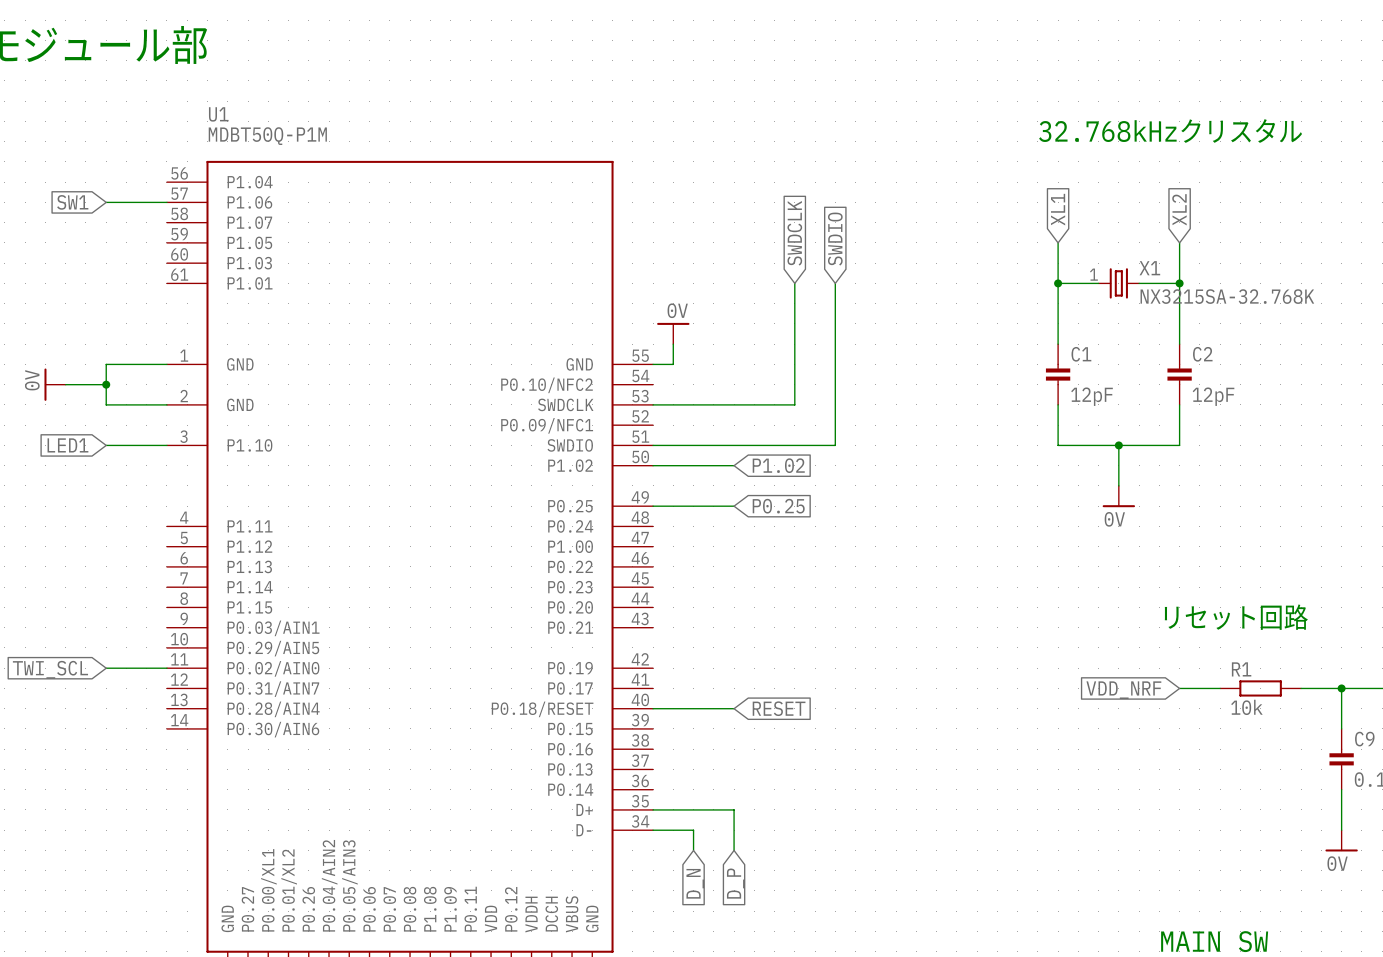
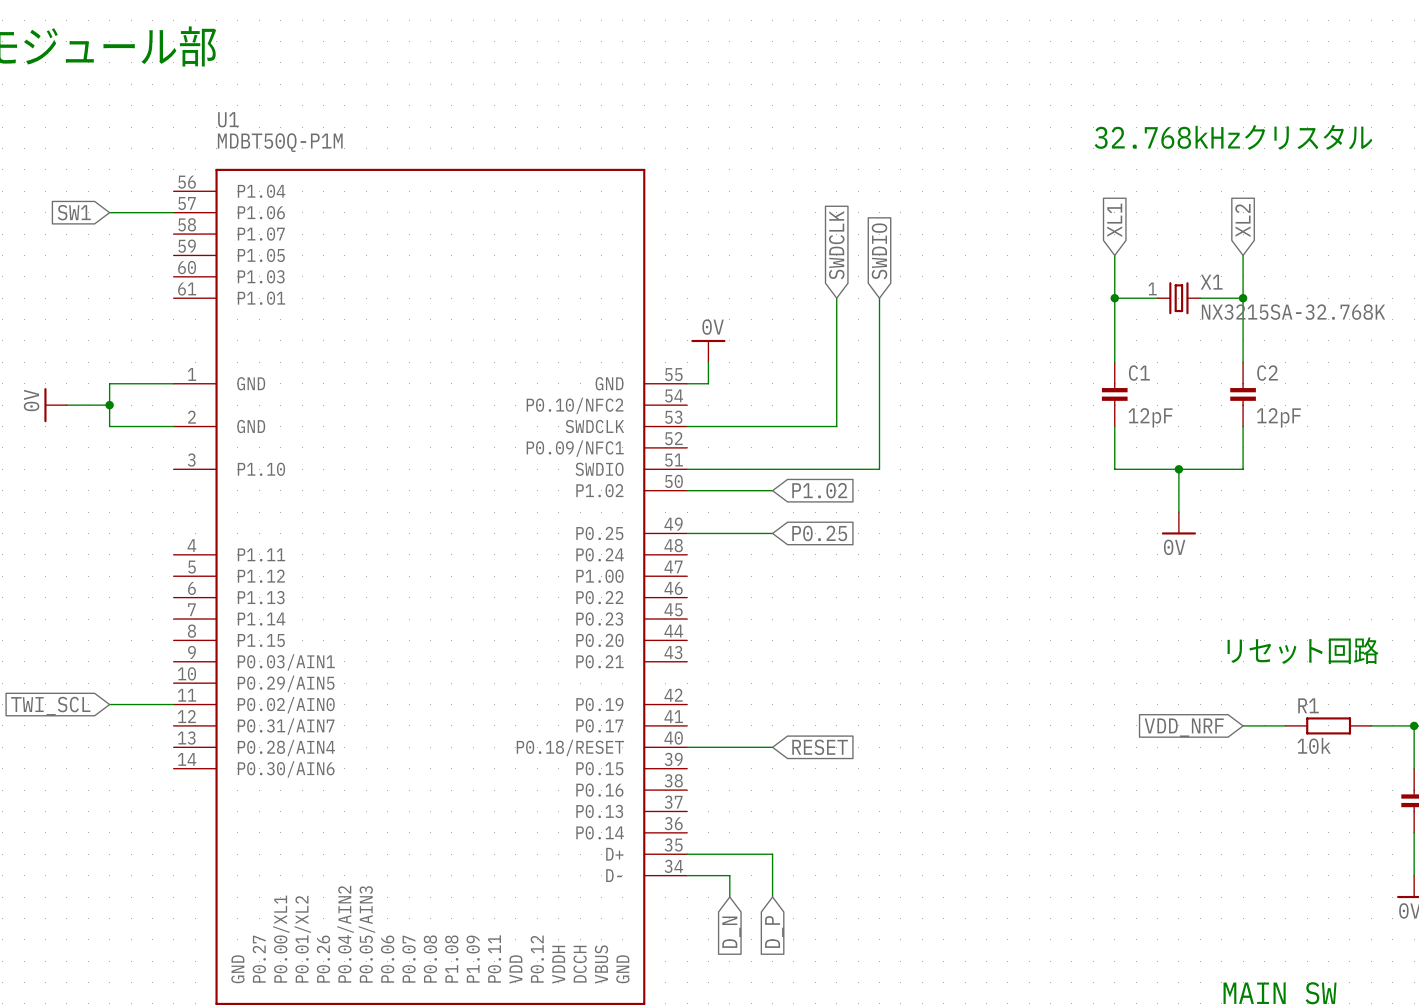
global label: LED1 (67, 445) -> none
wire: (106, 445) (166, 445) -> none

